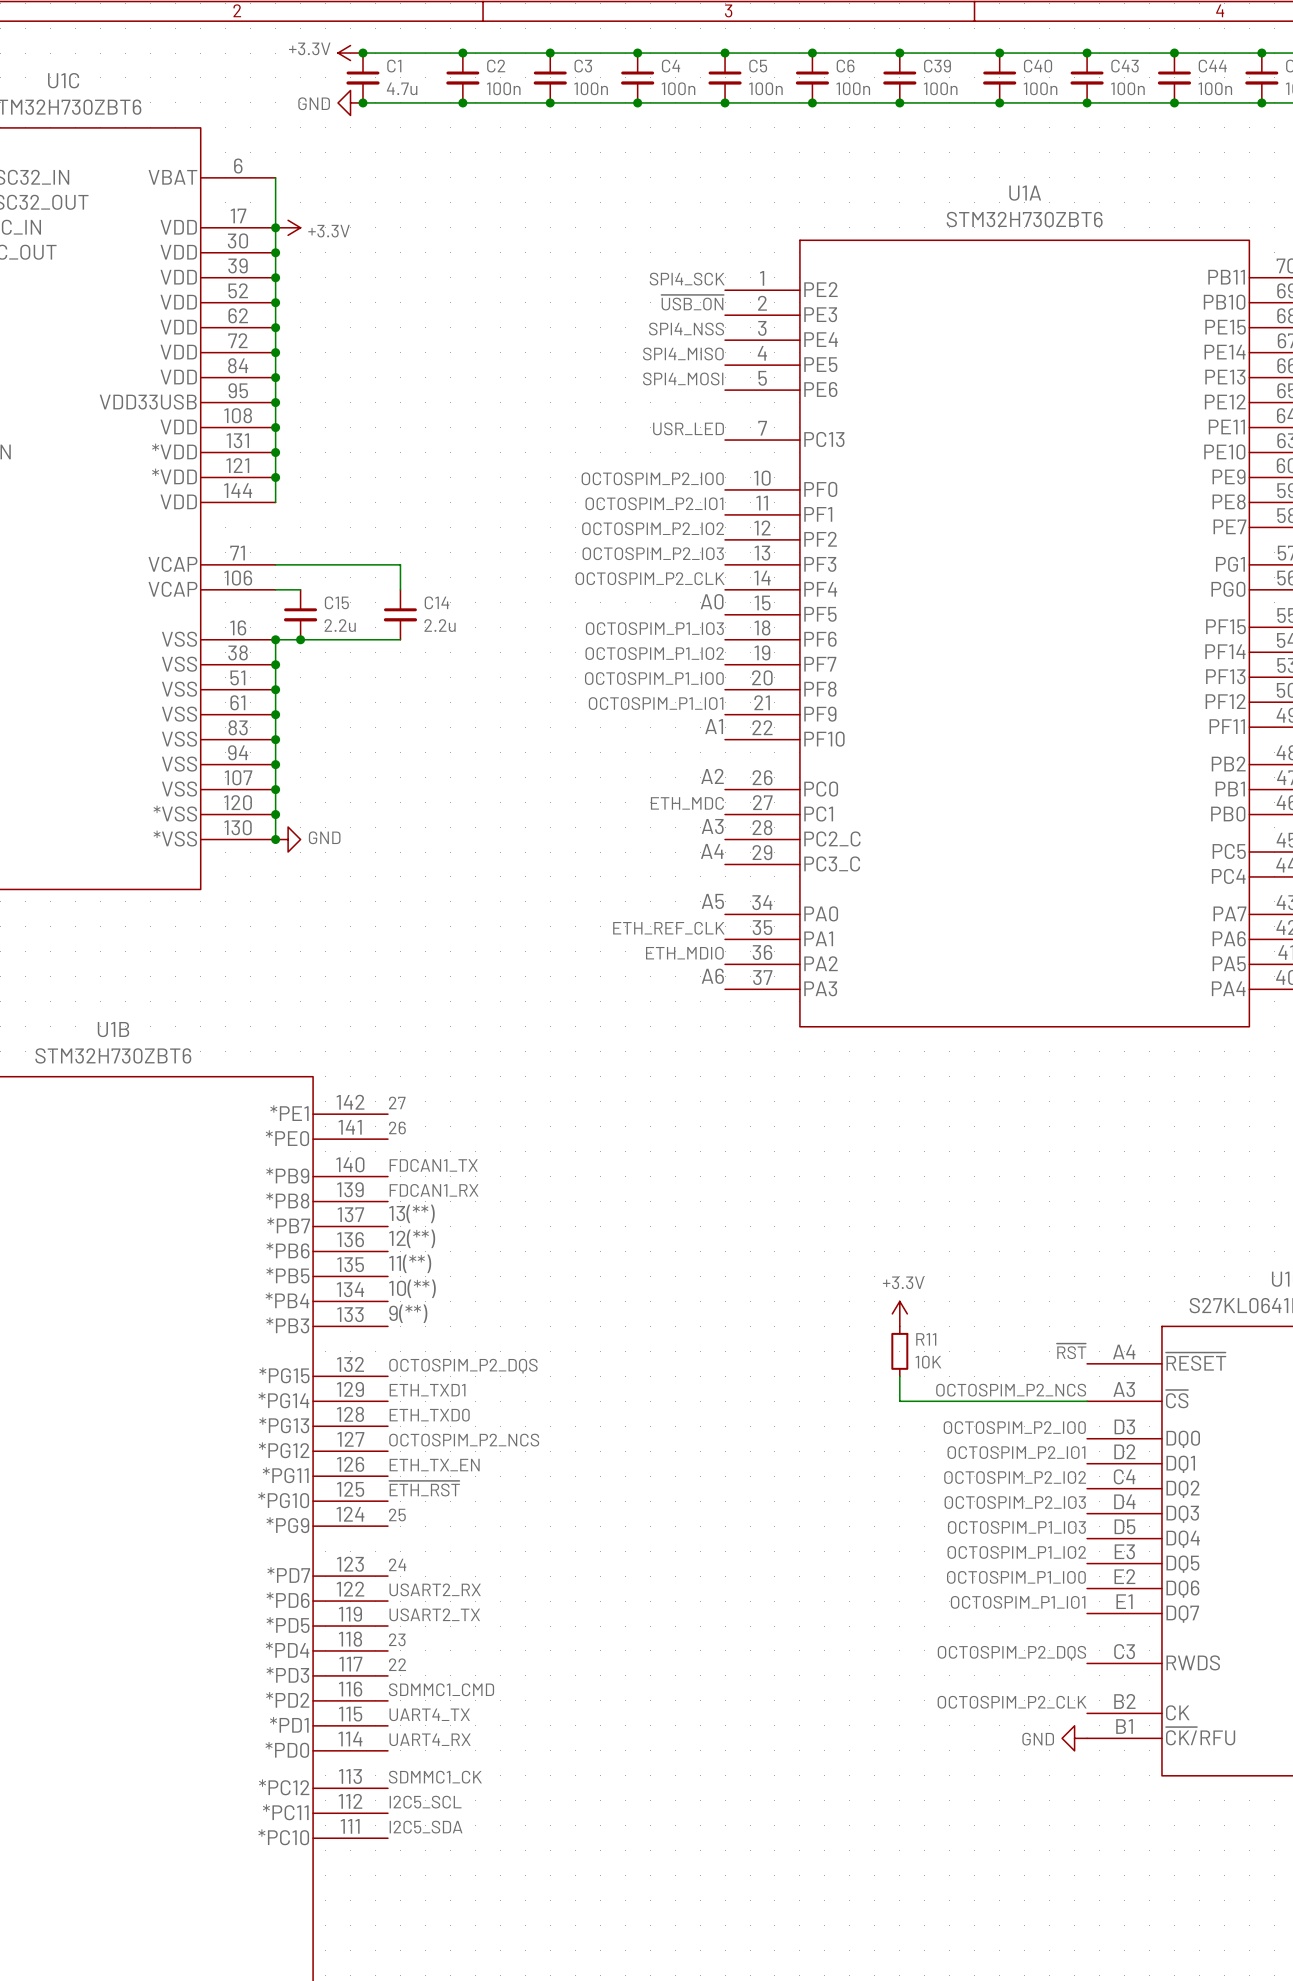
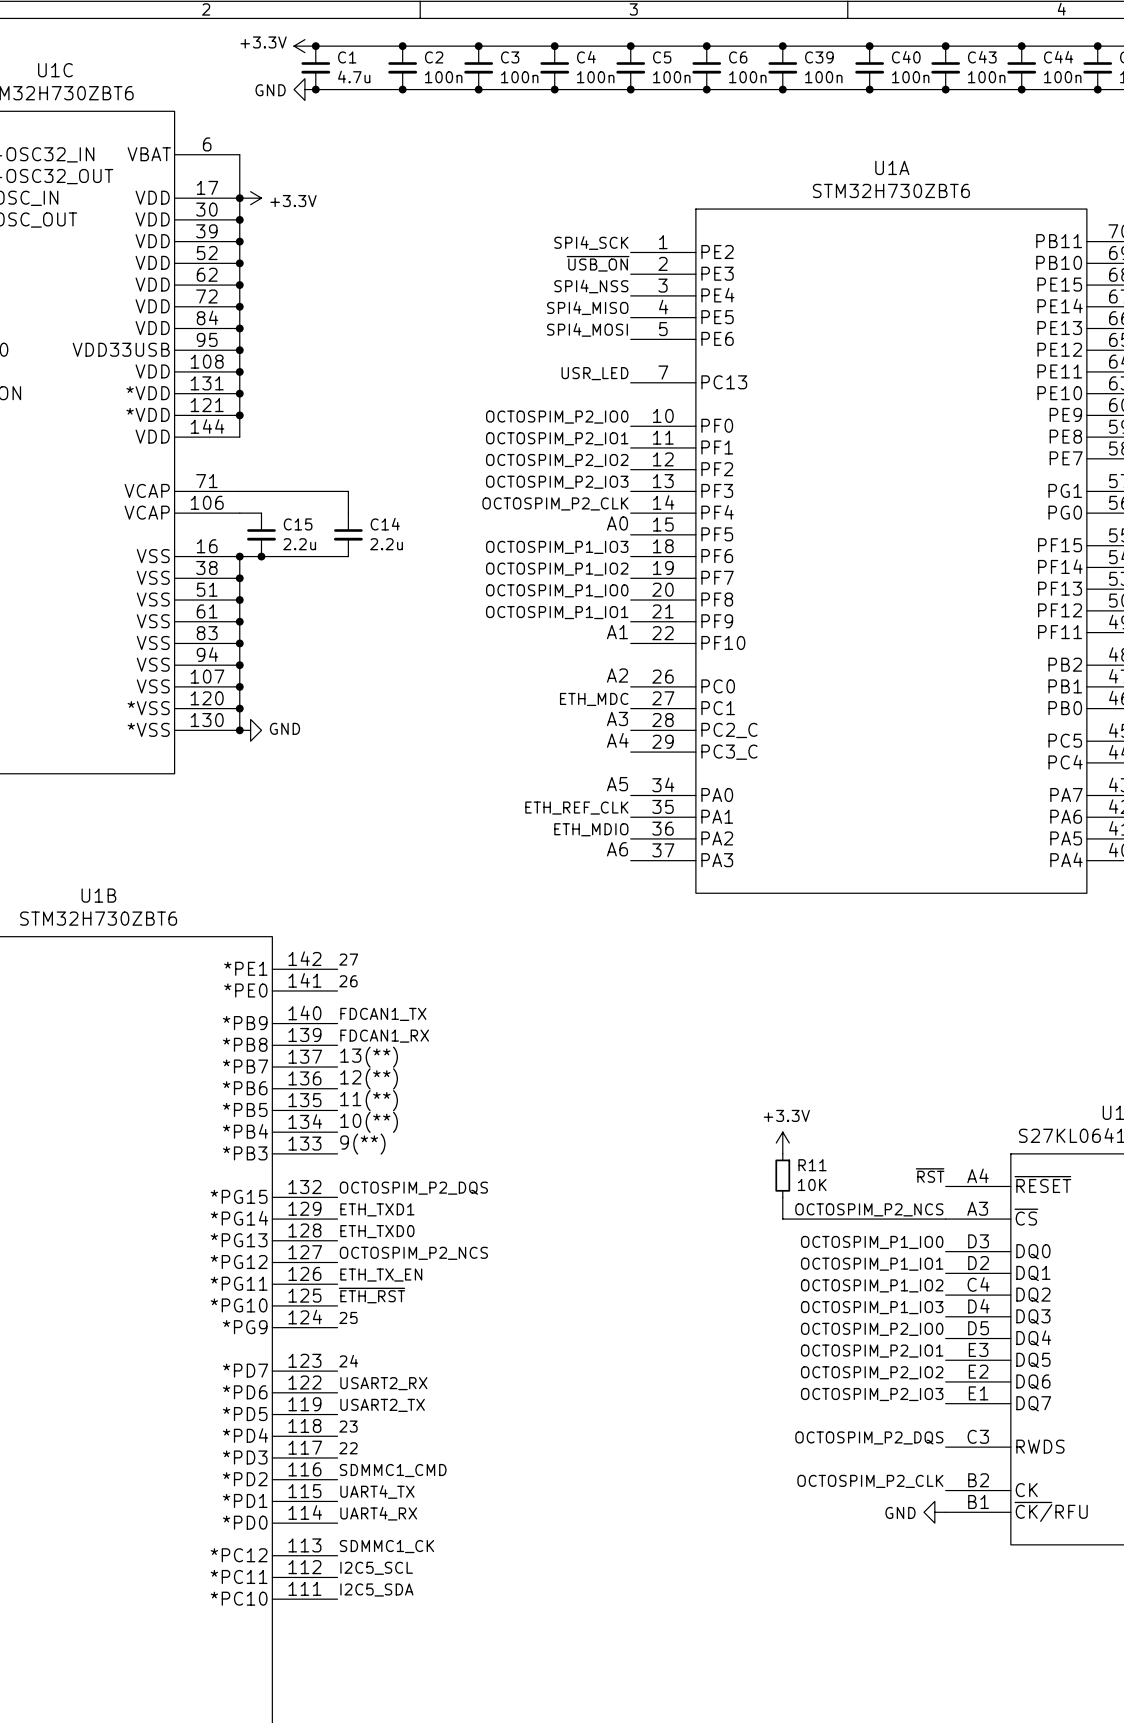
label: OCTOSPIM_P2_IO0 (1014, 1427) -> OCTOSPIM_P1_IO0 (872, 1242)
label: OCTOSPIM_P2_IO1 (1016, 1452) -> OCTOSPIM_P1_IO1 (872, 1264)
label: OCTOSPIM_P2_IO2 (1015, 1477) -> OCTOSPIM_P1_IO2 (872, 1285)
label: OCTOSPIM_P2_IO3 (1015, 1502) -> OCTOSPIM_P1_IO3 (872, 1307)
label: OCTOSPIM_P1_IO3 (1016, 1527) -> OCTOSPIM_P2_IO0 (872, 1329)
label: OCTOSPIM_P1_IO2 (1016, 1552) -> OCTOSPIM_P2_IO1 (872, 1351)
label: OCTOSPIM_P1_IO0 (1016, 1577) -> OCTOSPIM_P2_IO2 (872, 1372)
label: OCTOSPIM_P1_IO1 (1018, 1602) -> OCTOSPIM_P2_IO3 (872, 1394)

